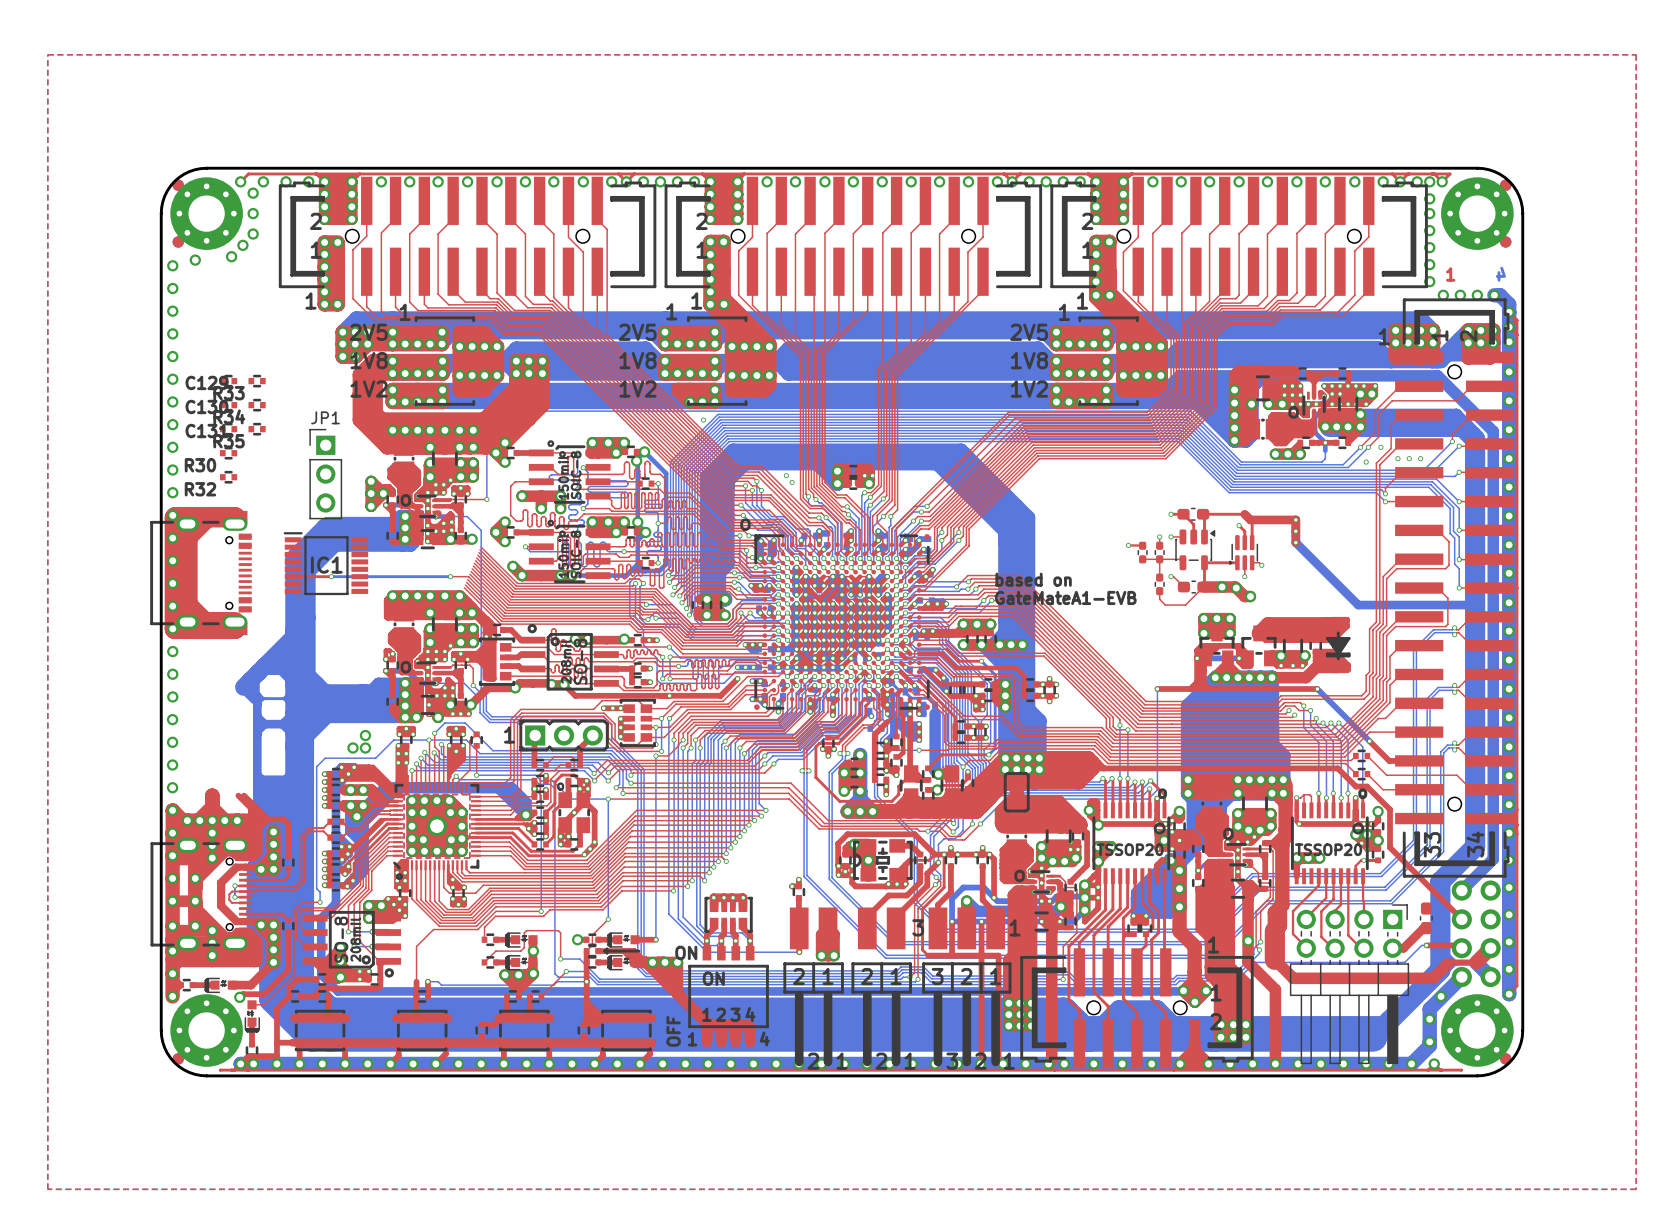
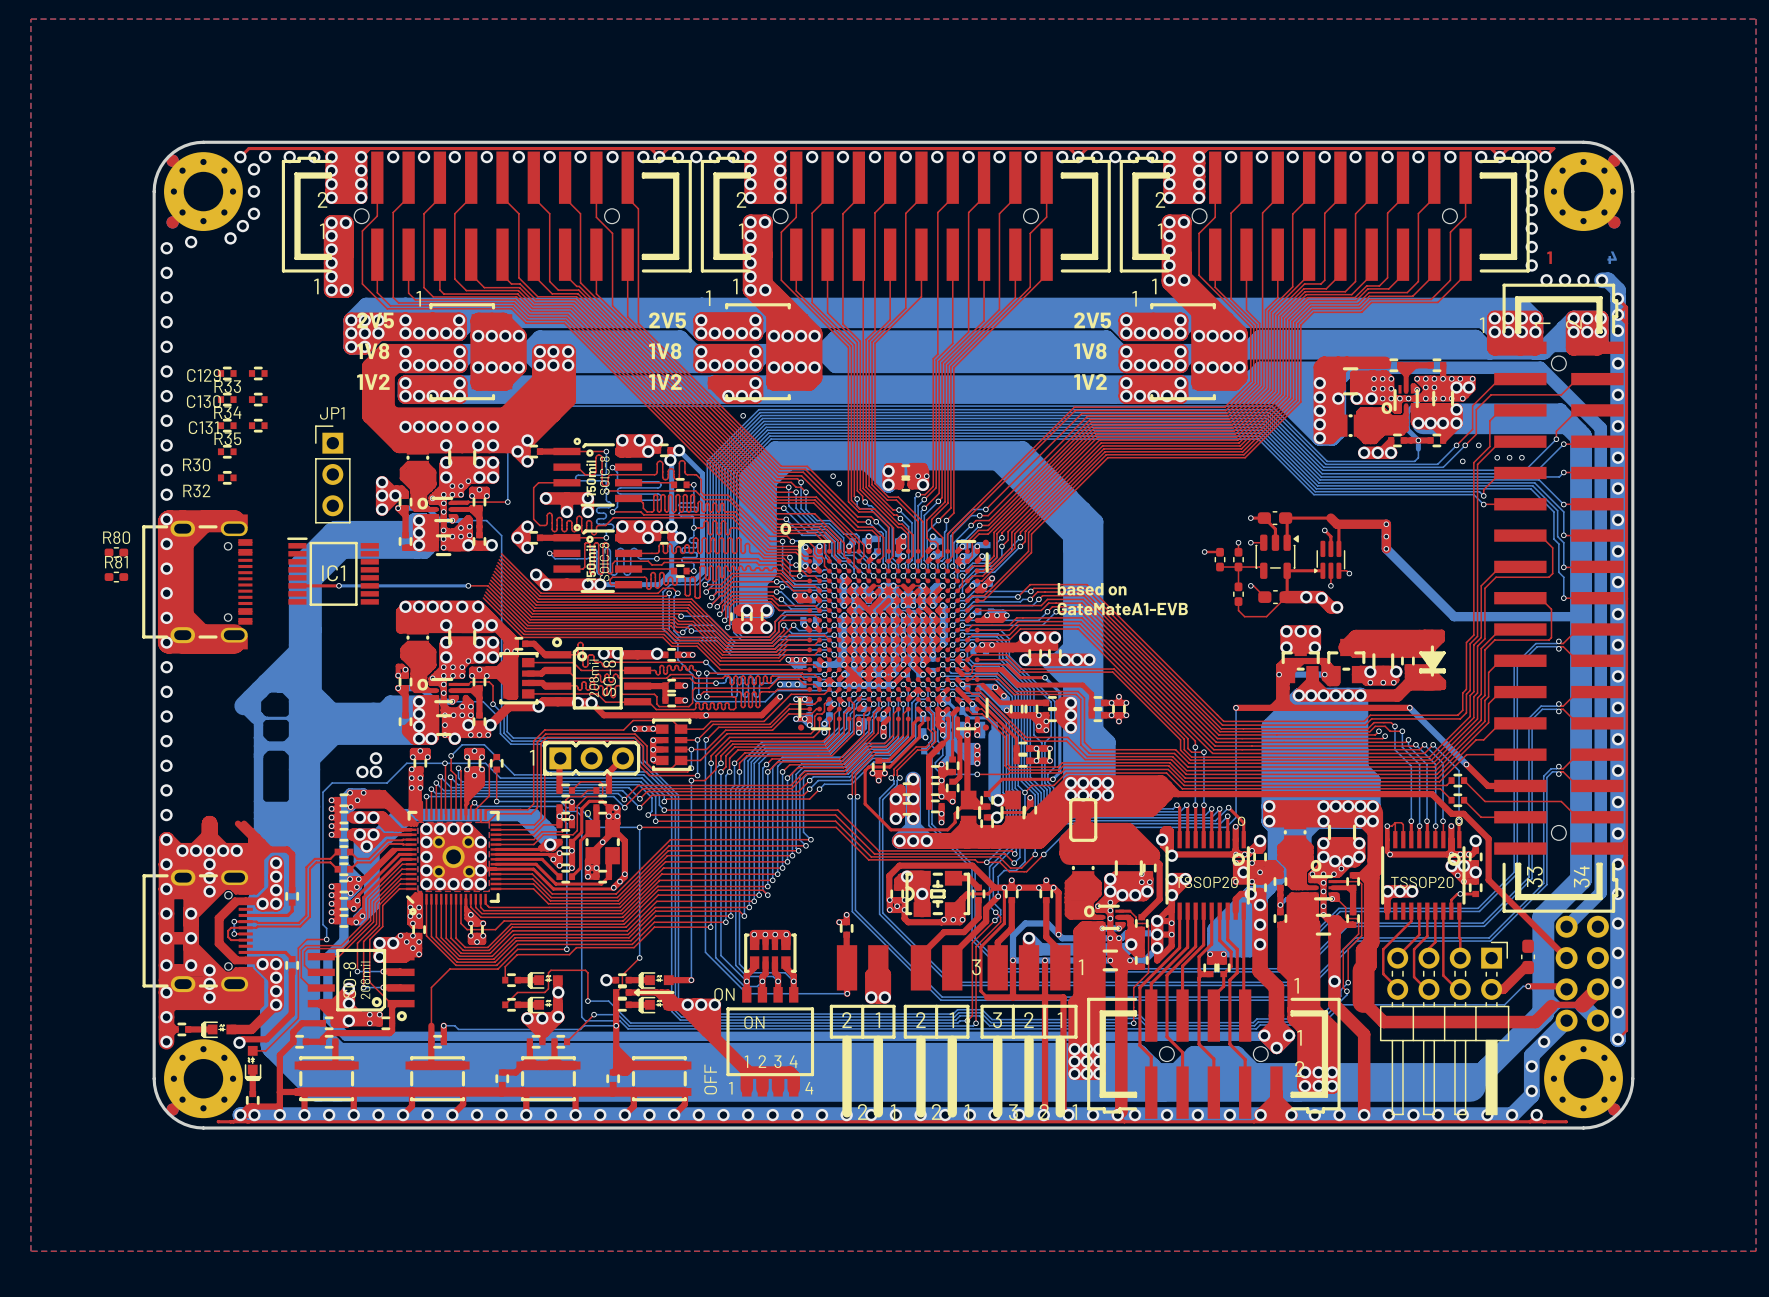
R80: none -> (116, 552)
R81: none -> (116, 577)

